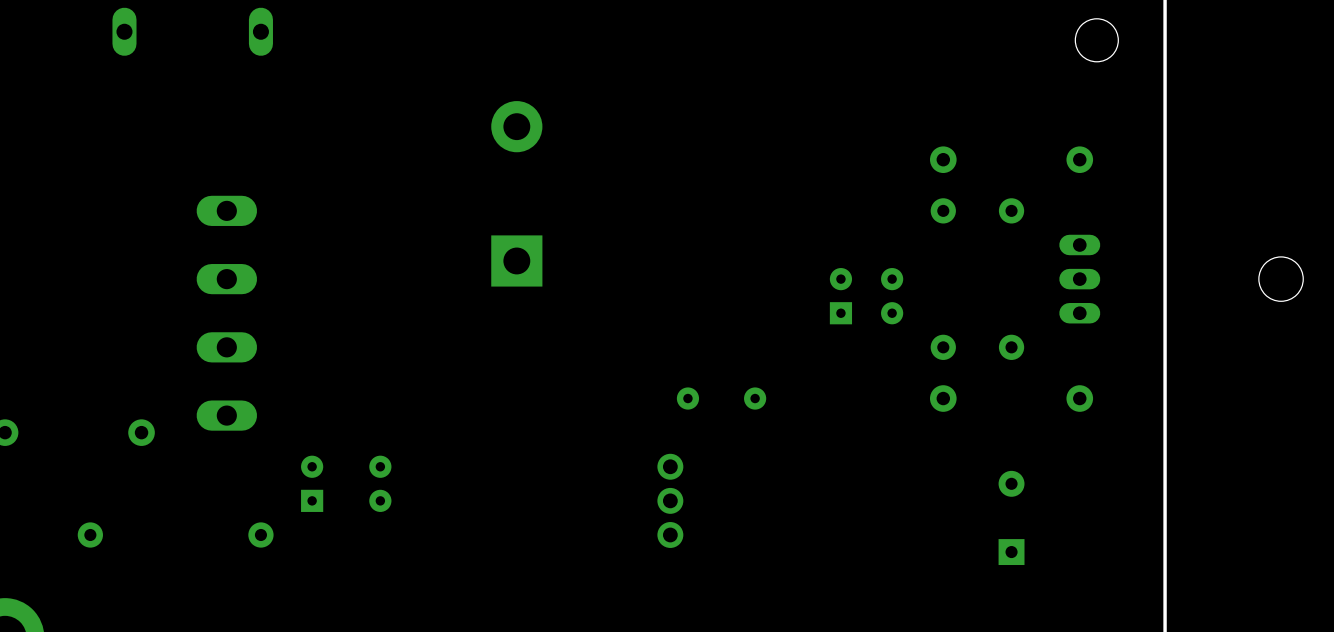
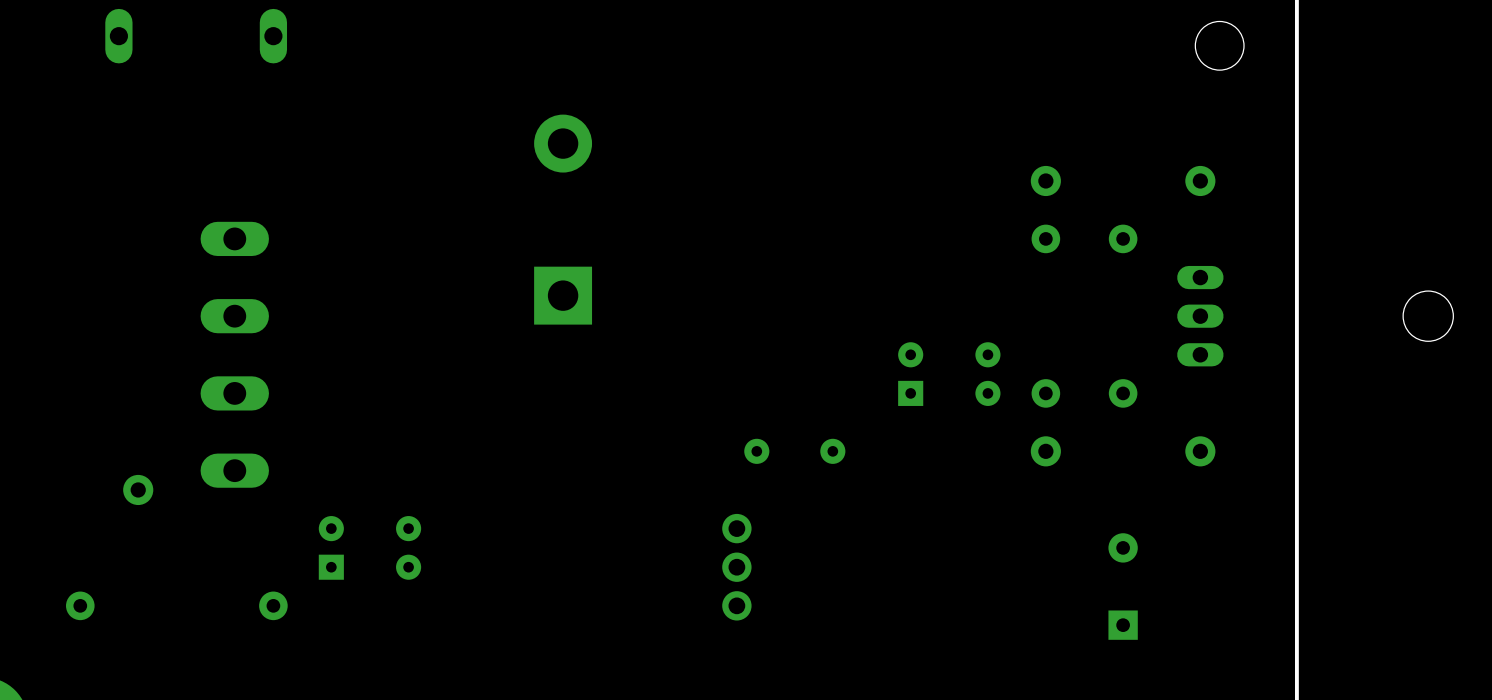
part position: (840, 296) -> (910, 374)
part position: (892, 296) -> (987, 374)

